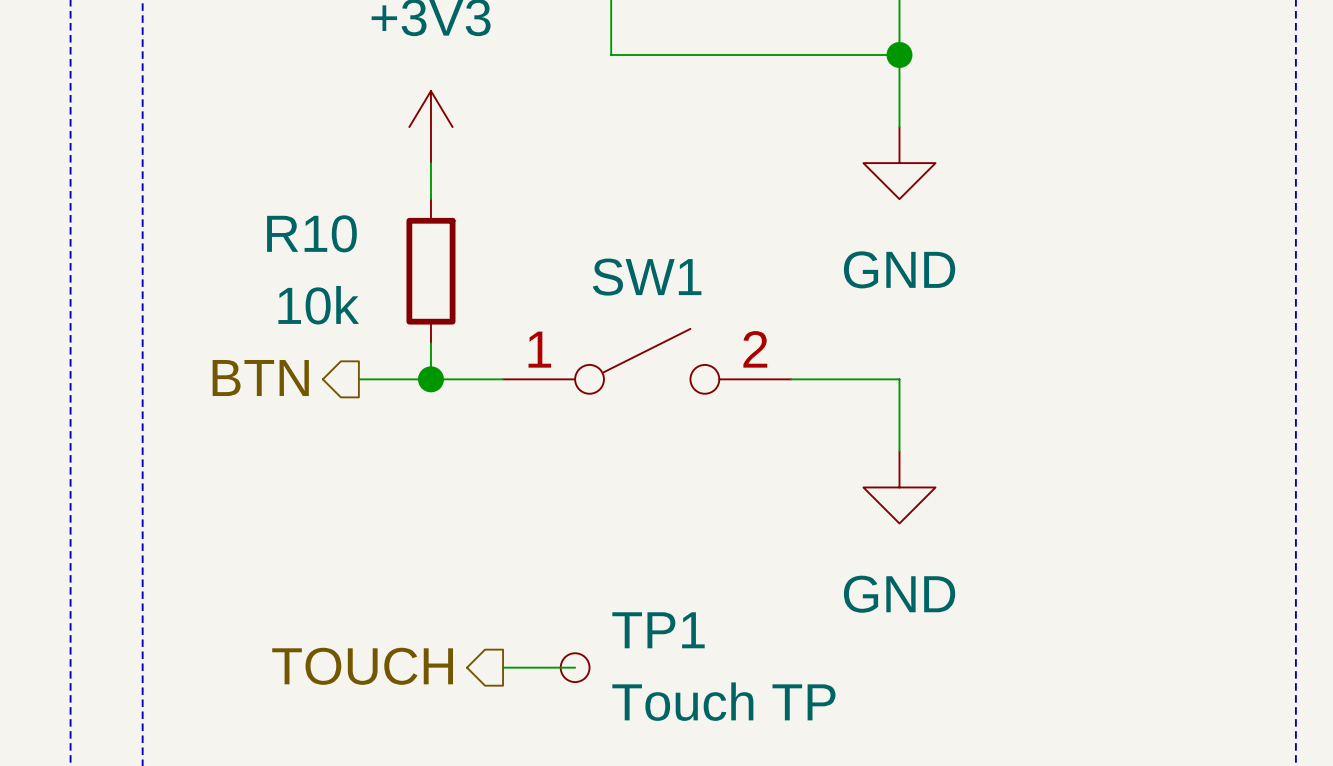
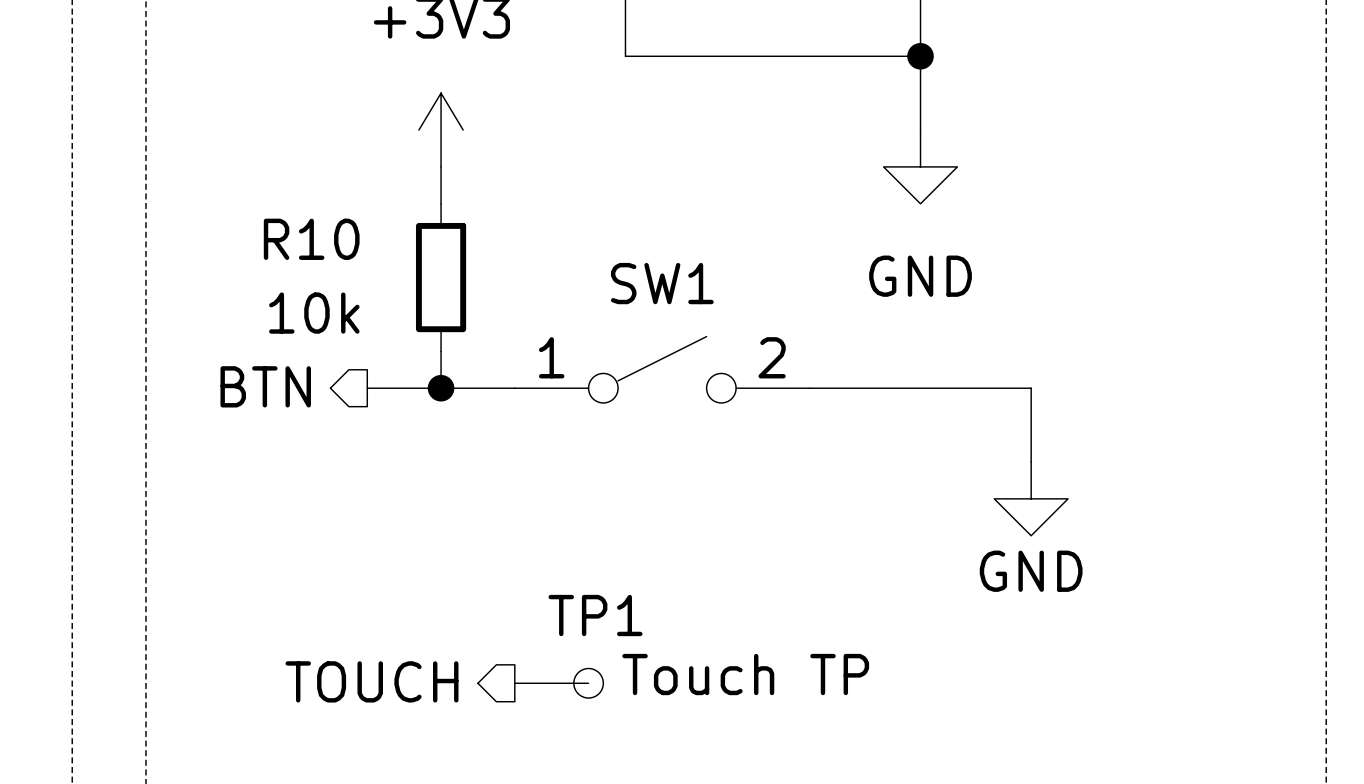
wire: (899, 379) (899, 451) -> (920, 388) (1031, 388) (1031, 461)
power symbol position: GND (899, 487) -> GND (1031, 498)
power symbol text position: GND (899, 594) -> GND (1031, 571)
TP1 name position: TP1 (658, 630) -> TP1 (595, 615)
TP1 value position: Touch TP (723, 701) -> Touch TP (745, 674)

